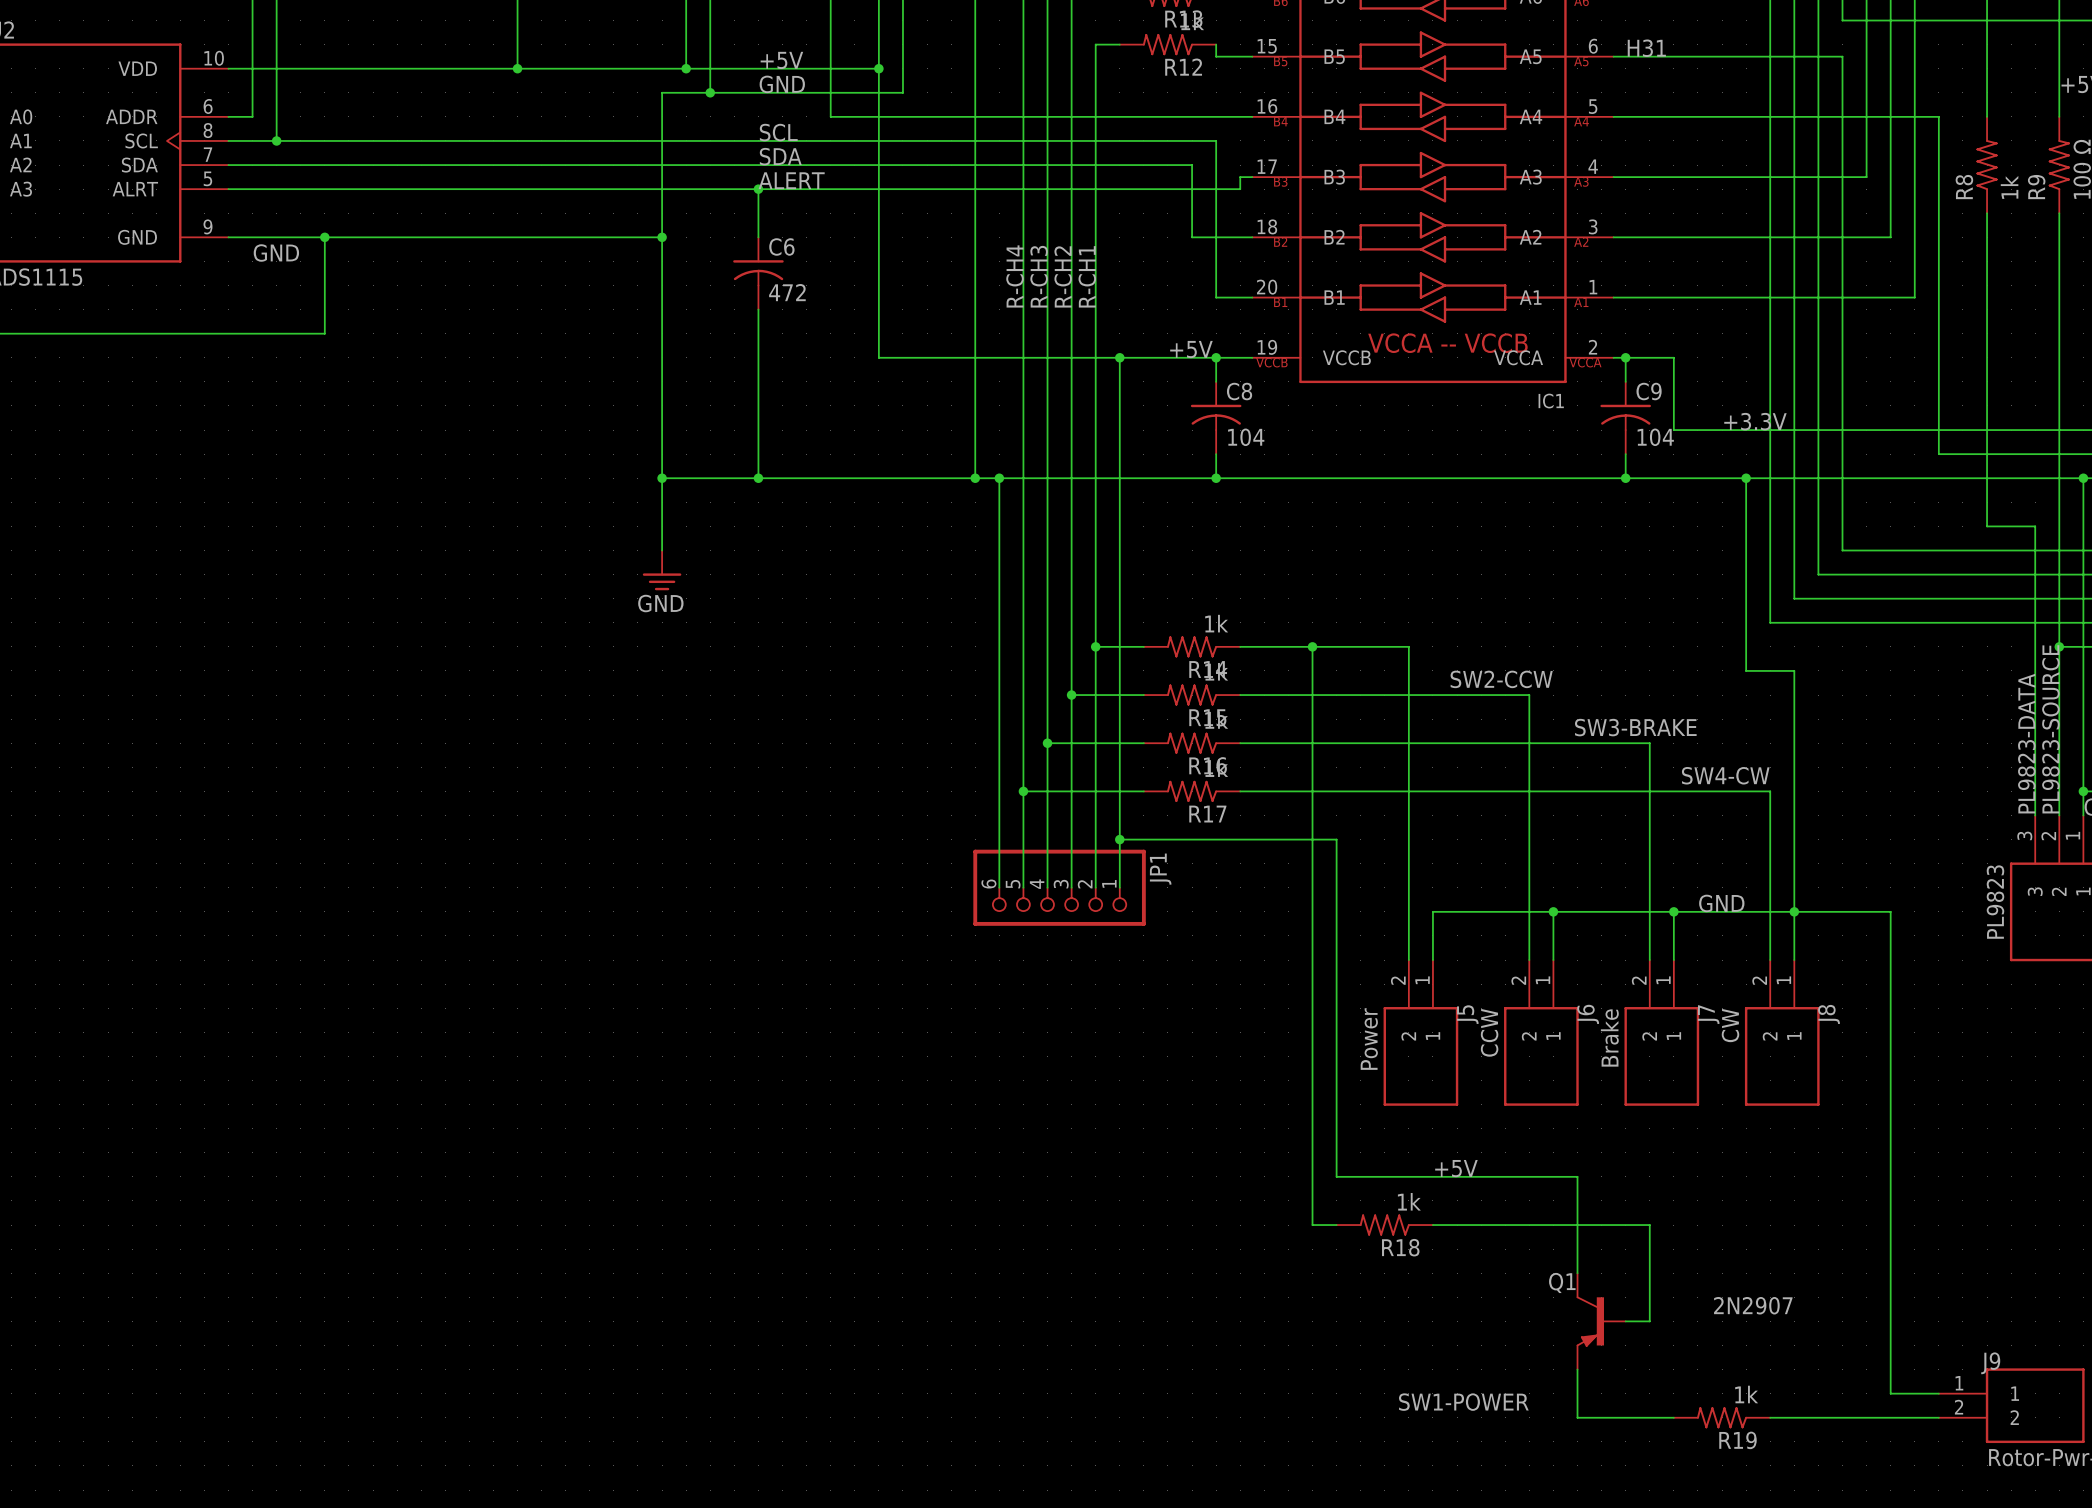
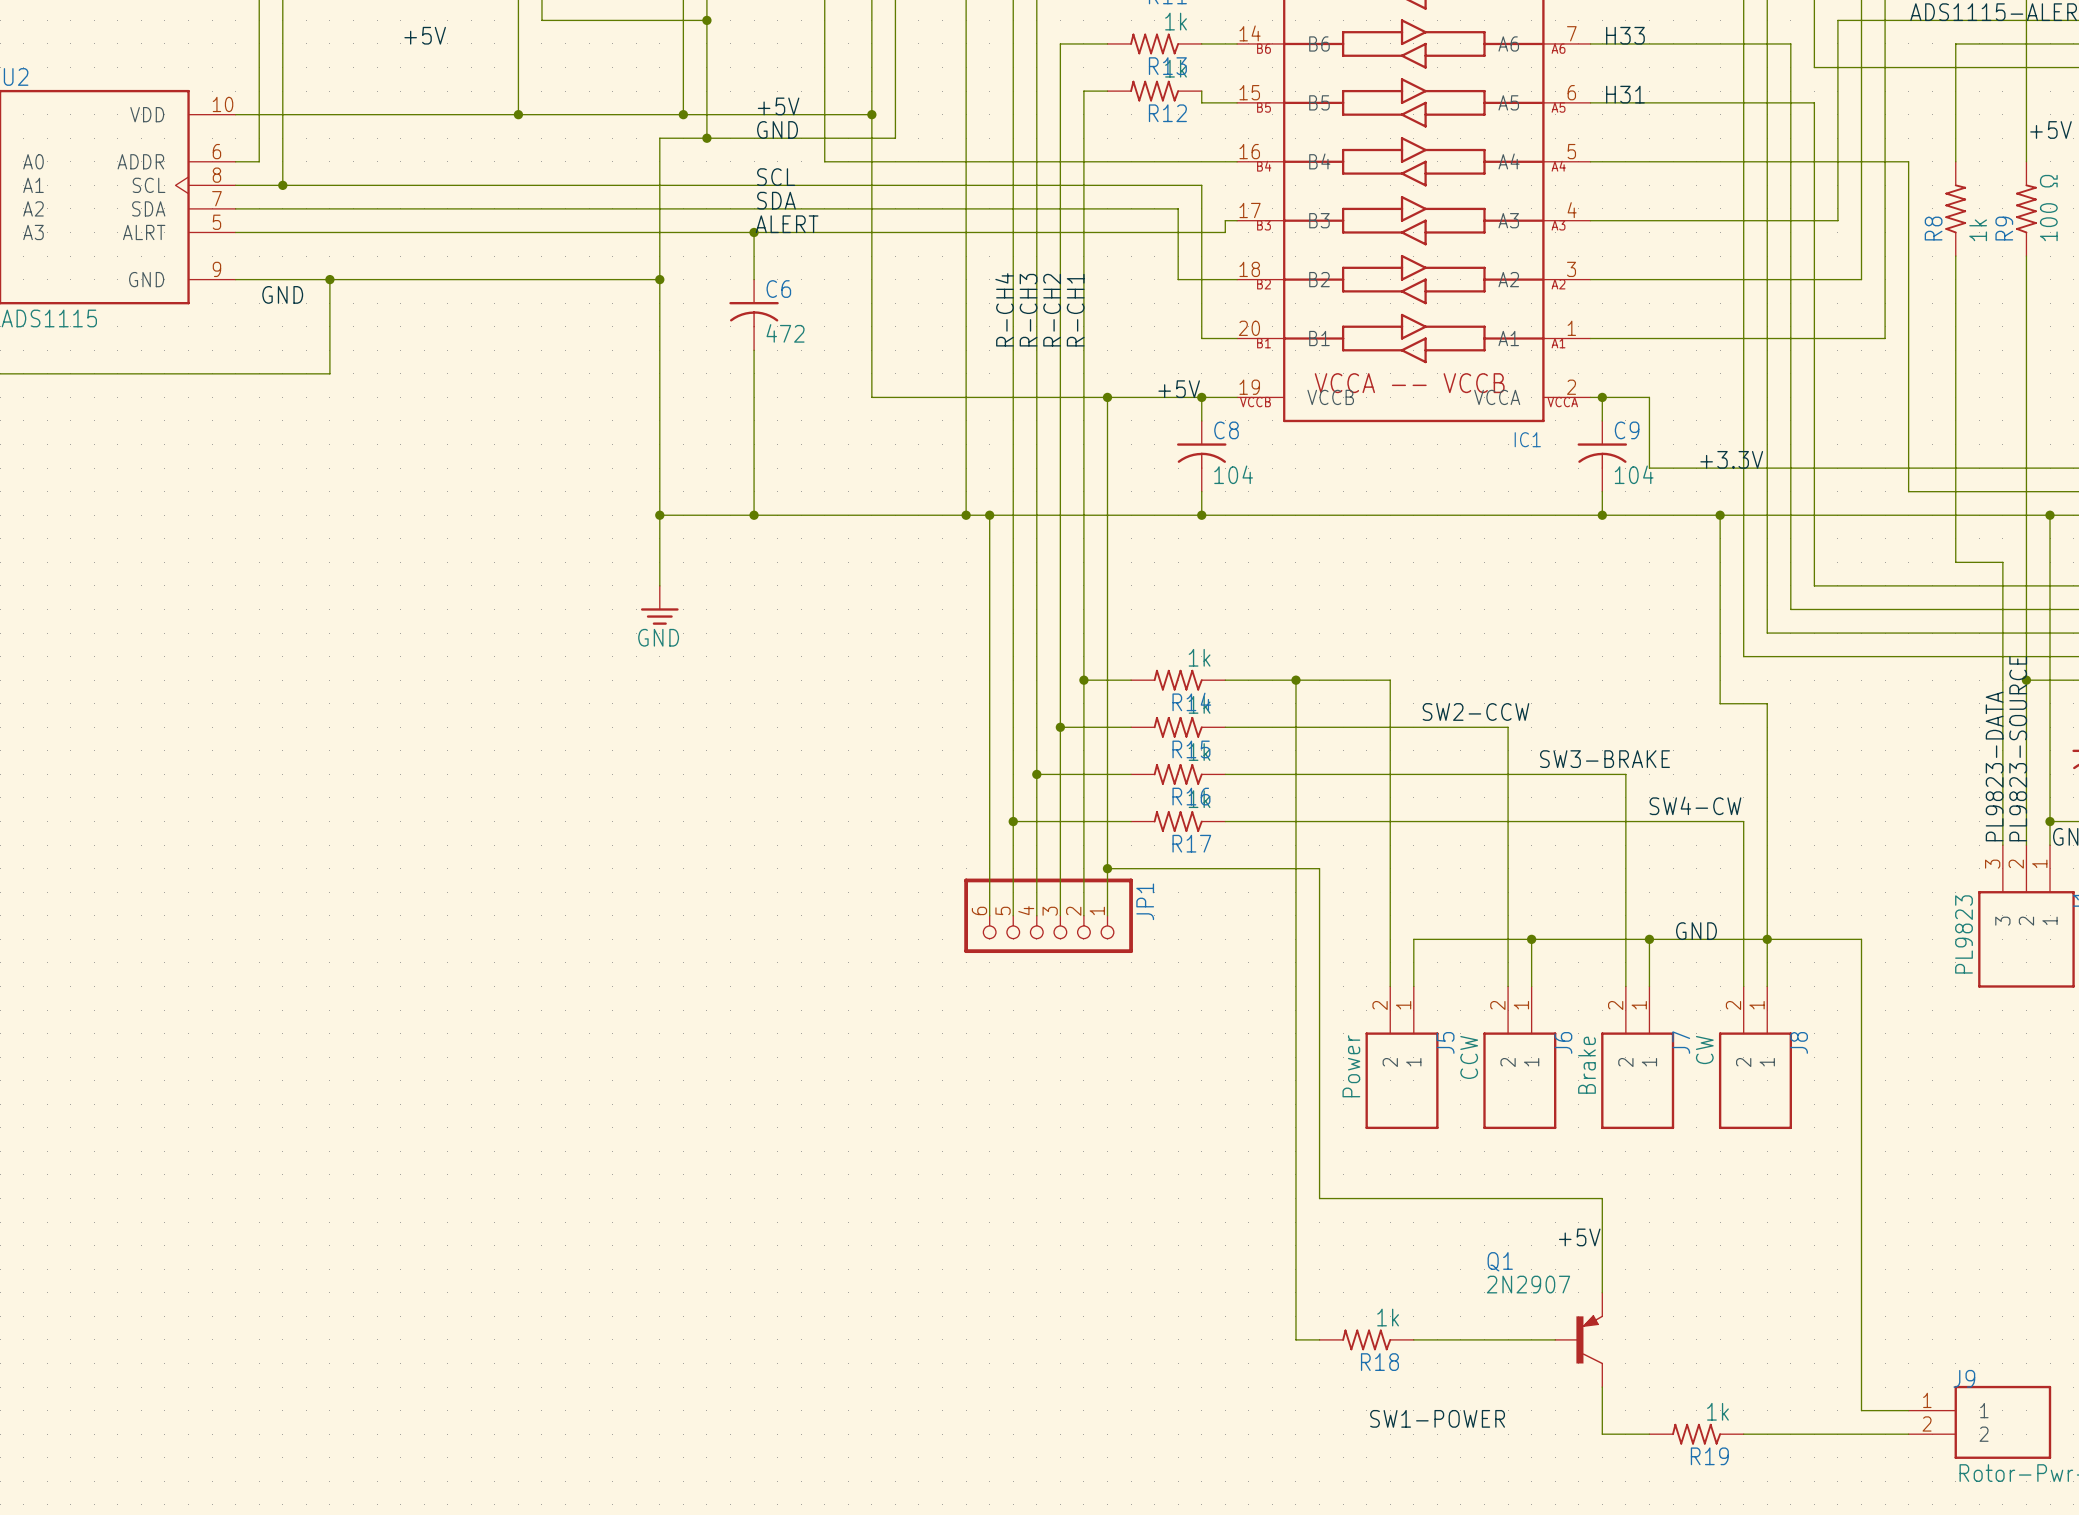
label position: +5V (1456, 1168) -> +5V (1579, 1237)
wire: (1577, 1176) (1577, 1273) -> (1555, 1198) (1602, 1198) (1602, 1292)
wire: (1312, 1225) (1336, 1225) -> (1295, 1245) (1295, 1339) (1319, 1339)
R18 position: (1384, 1225) -> (1366, 1339)
wire: (1432, 1225) (1649, 1225) (1649, 1321) (1625, 1321) -> none
Q1 name position: Q1 (1562, 1282) -> Q1 (1500, 1261)
Q1 value position: 2N2907 (1753, 1305) -> 2N2907 (1528, 1284)
wire: none -> (1413, 1339) (1555, 1339)
Q1 rotation: 0° (1590, 1321) -> 180° (1589, 1339)
wire: (1577, 1369) (1577, 1417) (1625, 1417) -> (1602, 1387) (1602, 1434)

